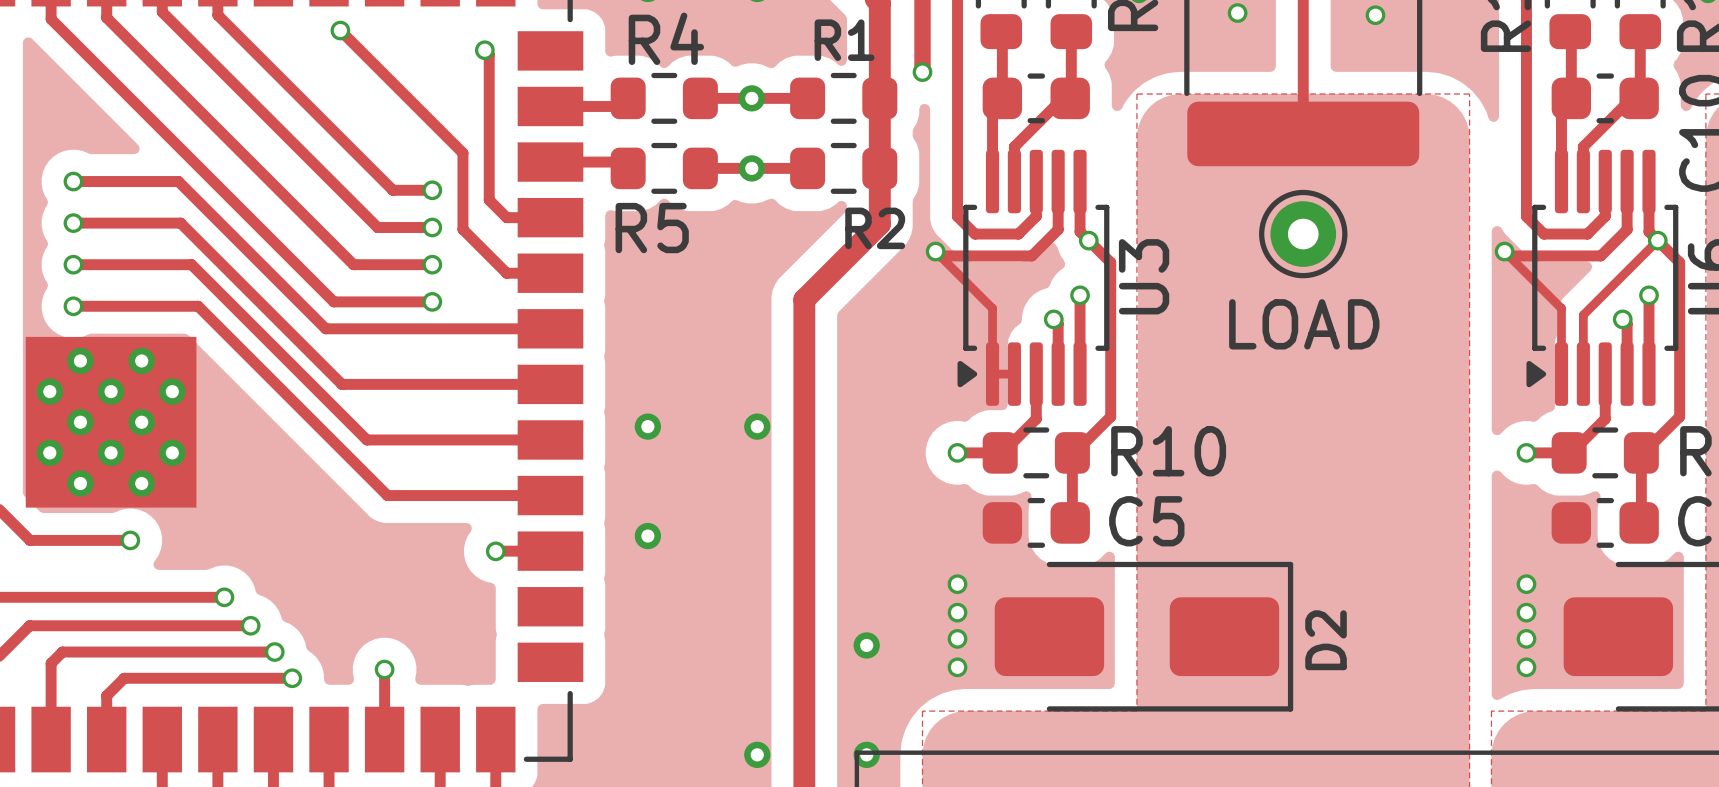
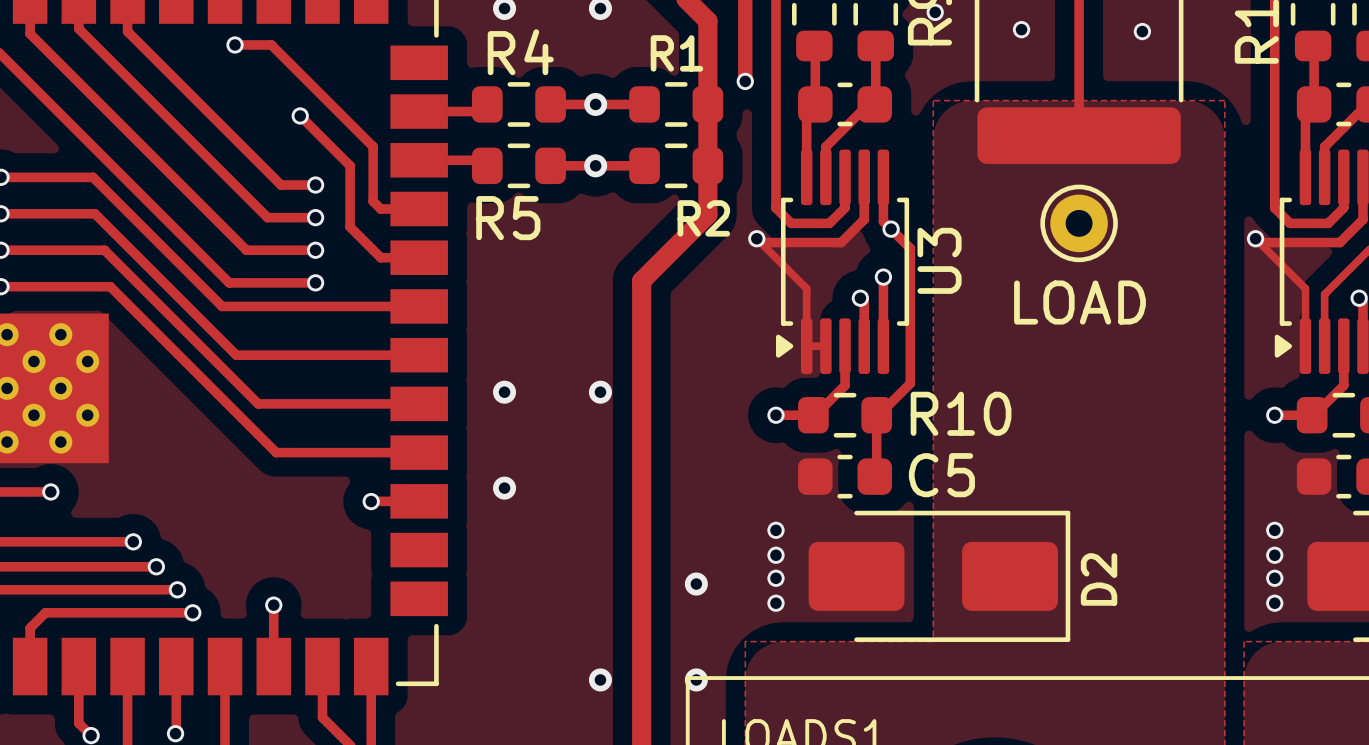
track: (340, 30) (462, 153) (462, 229) (471, 238) -> (235, 44) (271, 44) (373, 146) (373, 201)
track: (484, 50) (489, 54) (489, 200) (497, 208) -> none
via position: (484, 50) -> (300, 115)
track: none -> (300, 115) (350, 165) (350, 227)

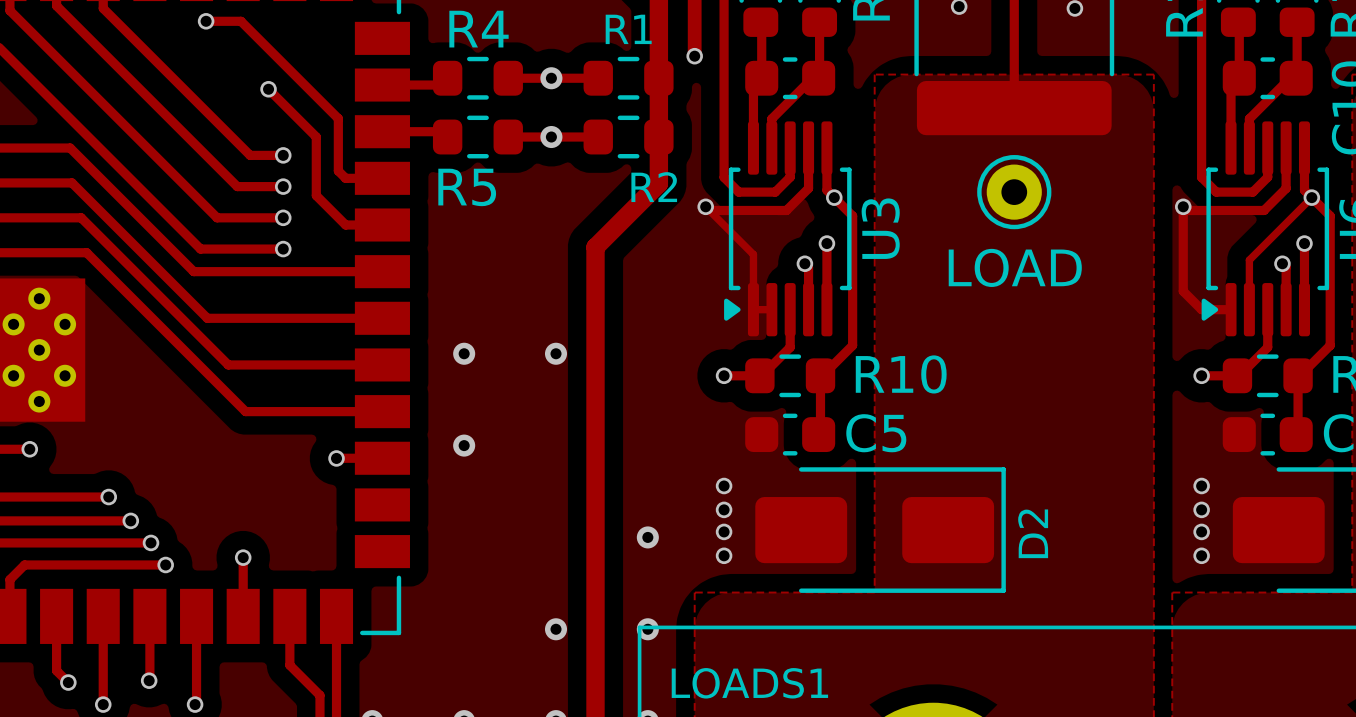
track: (1255, 238) (1305, 288) (1305, 346) -> (1183, 206) (1183, 291) (1201, 309) (1231, 309)

